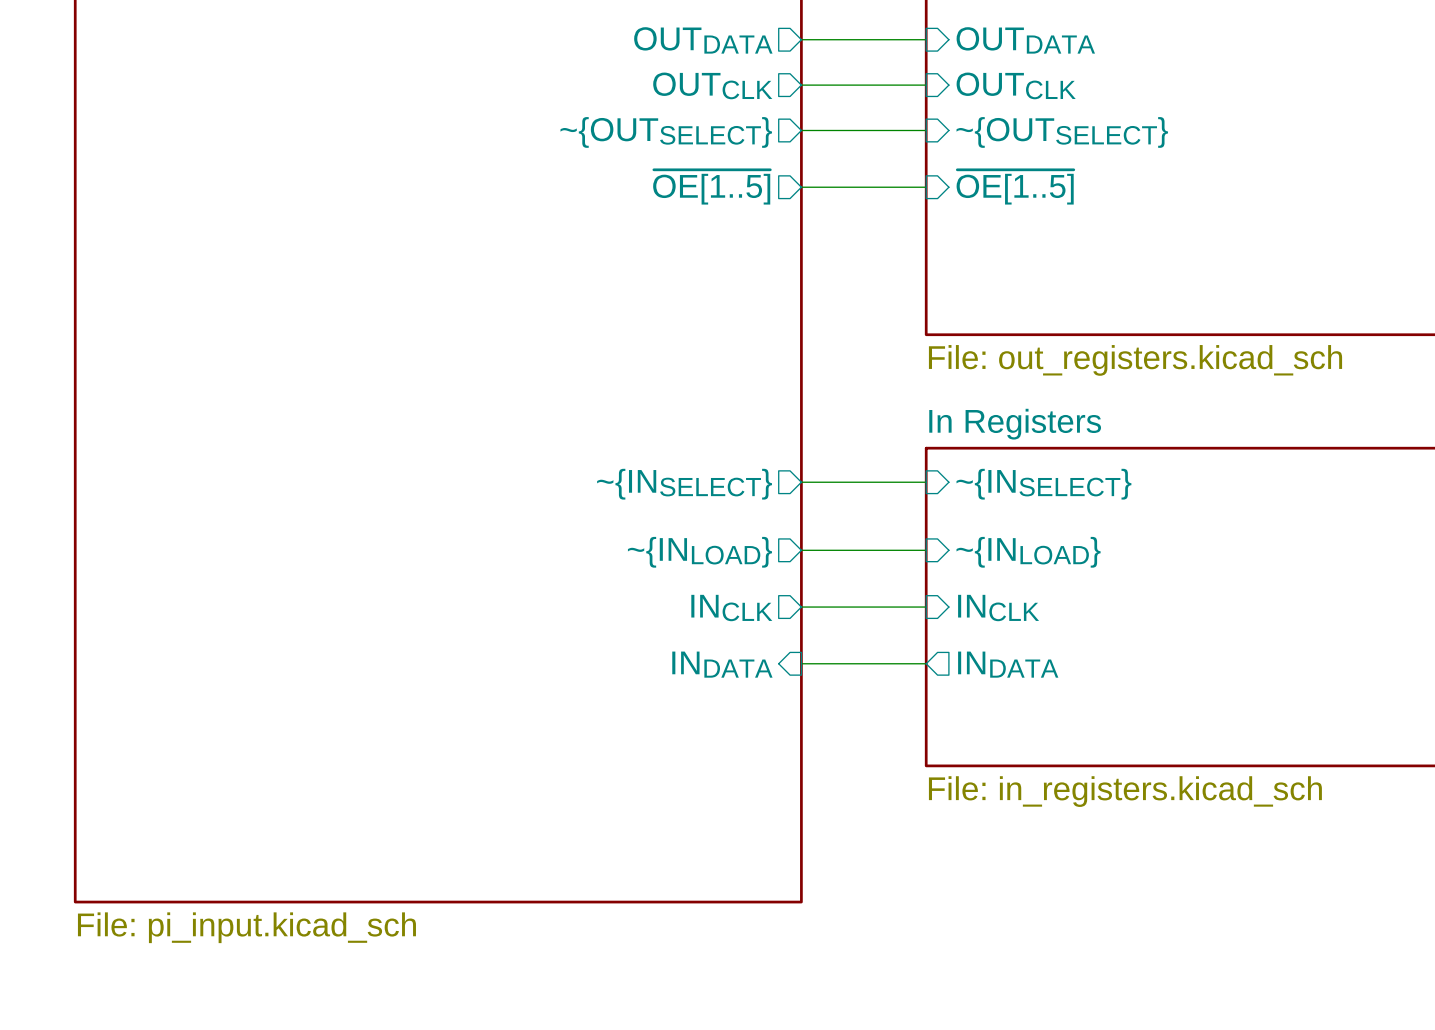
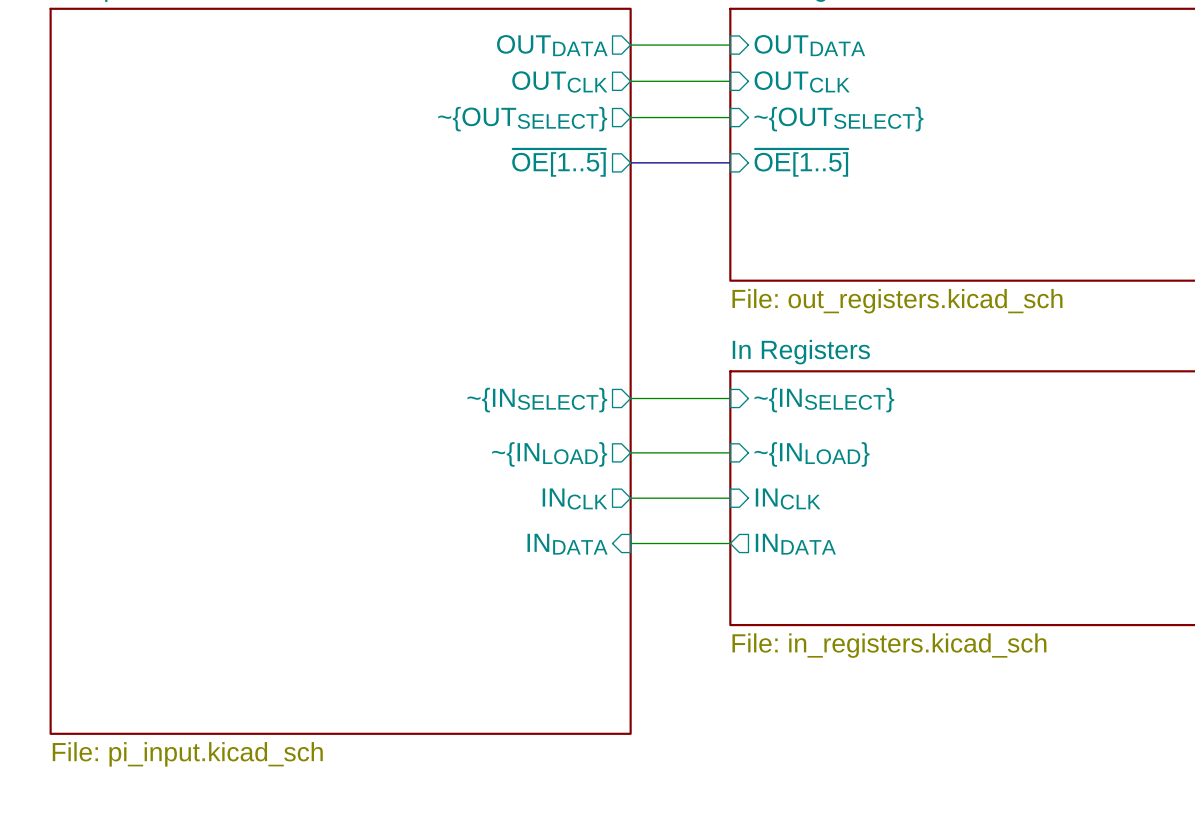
bus: none -> (630, 162) (730, 162)

